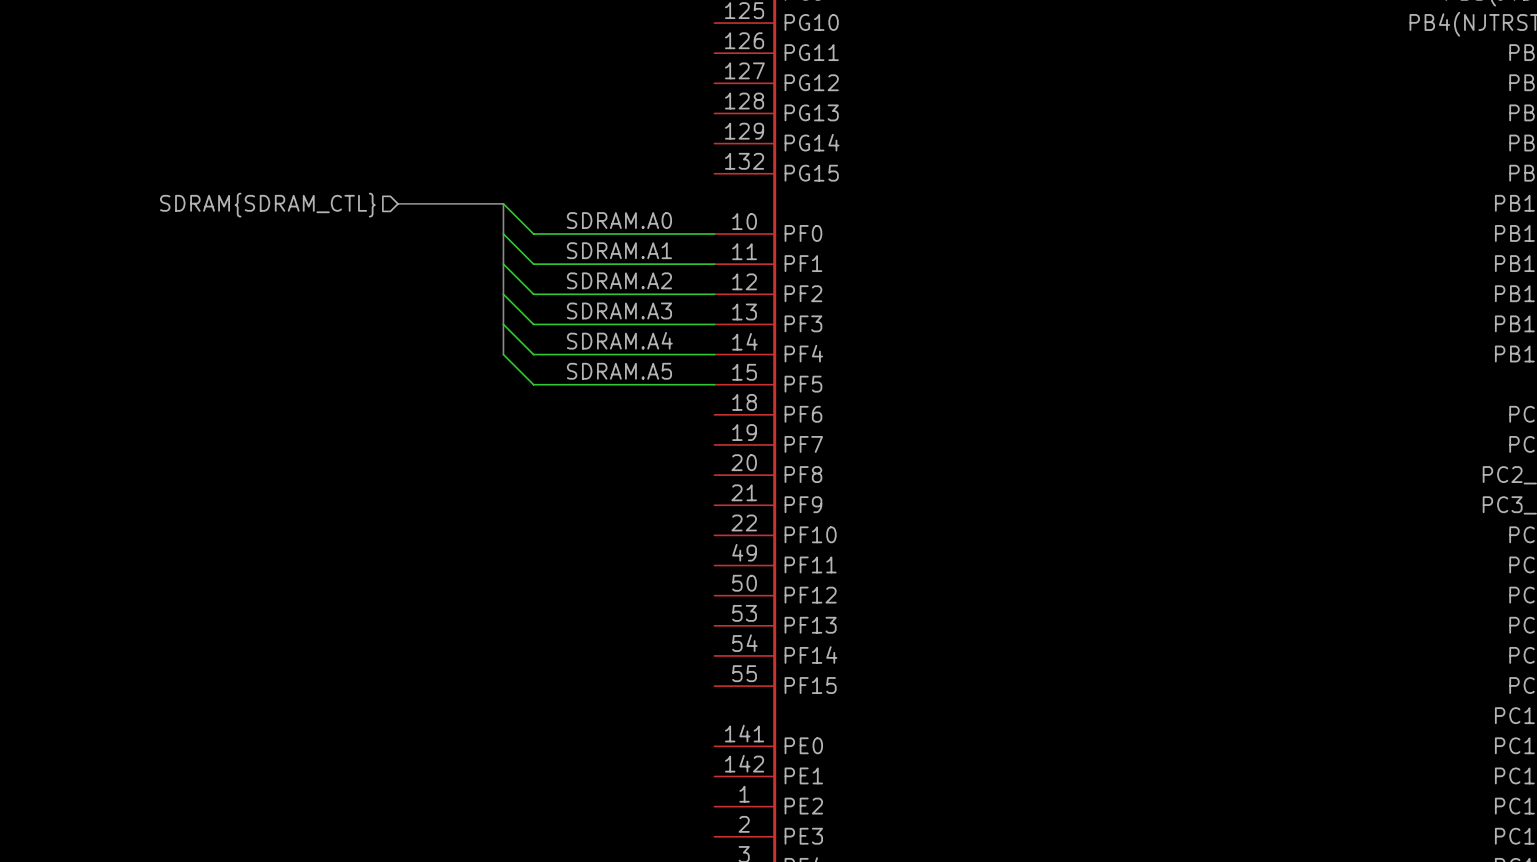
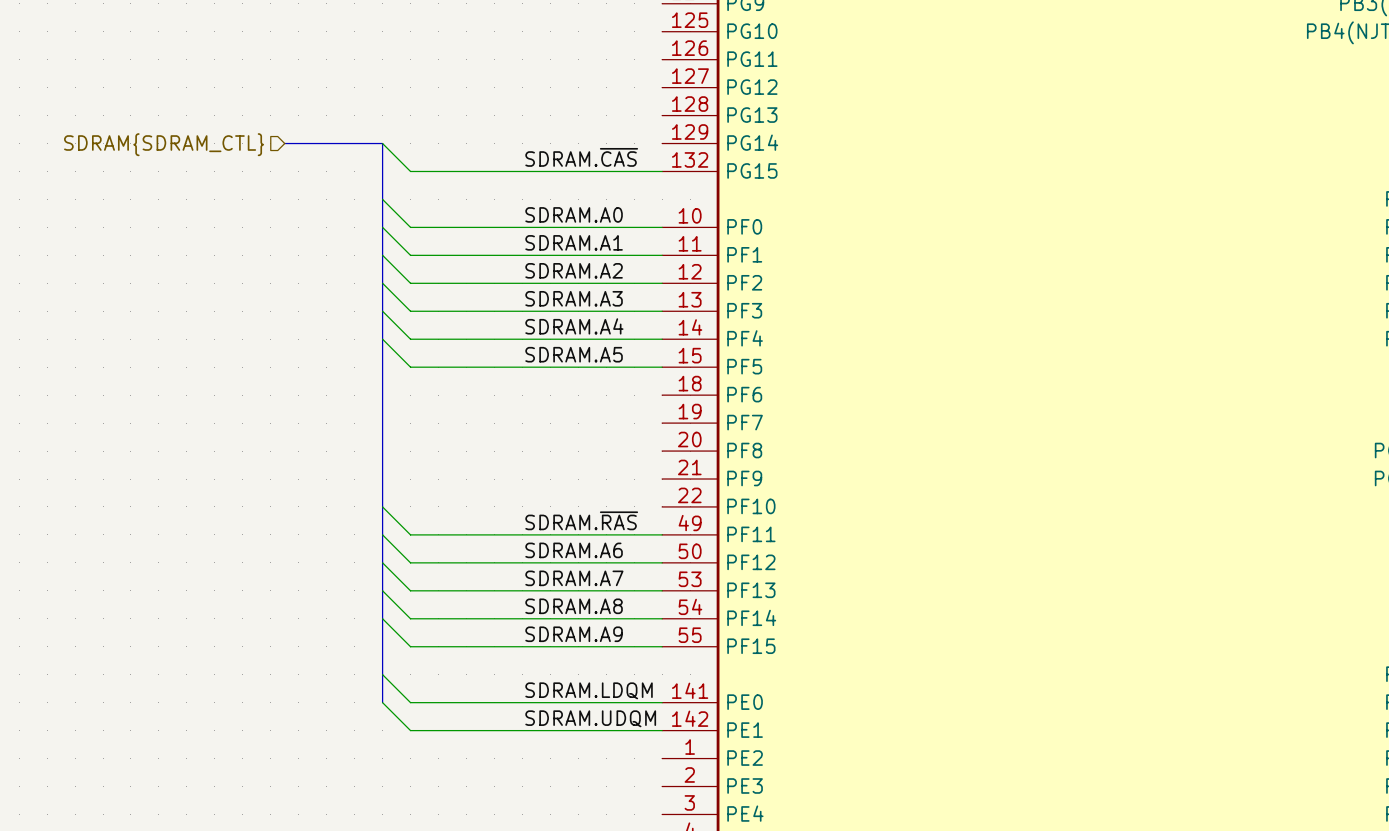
bus: none -> (284, 143) (382, 143) (382, 702)
wire: none -> (382, 143) (410, 171) (662, 171)
label: none -> SDRAM.~{CAS} (581, 157)
bus: (397, 203) (503, 203) (503, 354) -> none
wire: (503, 203) (533, 234) -> (382, 199) (410, 227) (494, 227)
hierarchical label position: SDRAM{SDRAM_CTL} (267, 205) -> SDRAM{SDRAM_CTL} (164, 144)
wire: (503, 234) (533, 264) -> (382, 227) (410, 255) (494, 255)
wire: (503, 264) (533, 294) -> (382, 255) (410, 283) (494, 283)
wire: (503, 294) (533, 324) -> (382, 283) (410, 311) (494, 311)
wire: (503, 324) (533, 354) -> (382, 311) (410, 339) (494, 339)
wire: (503, 354) (533, 384) -> (382, 339) (410, 367) (494, 367)
wire: none -> (382, 506) (410, 534) (662, 534)
label: none -> SDRAM.~{RAS} (581, 520)
wire: none -> (382, 534) (410, 562) (662, 562)
label: none -> SDRAM.A6 (574, 550)
wire: none -> (382, 562) (410, 590) (662, 590)
label: none -> SDRAM.A7 (574, 578)
wire: none -> (382, 590) (410, 618) (662, 618)
label: none -> SDRAM.A8 (574, 606)
wire: none -> (382, 618) (410, 646) (662, 646)
label: none -> SDRAM.A9 (574, 634)
wire: none -> (382, 674) (410, 702) (662, 702)
label: none -> SDRAM.LDQM (589, 690)
wire: none -> (382, 702) (410, 730) (662, 730)
label: none -> SDRAM.UDQM (590, 718)

